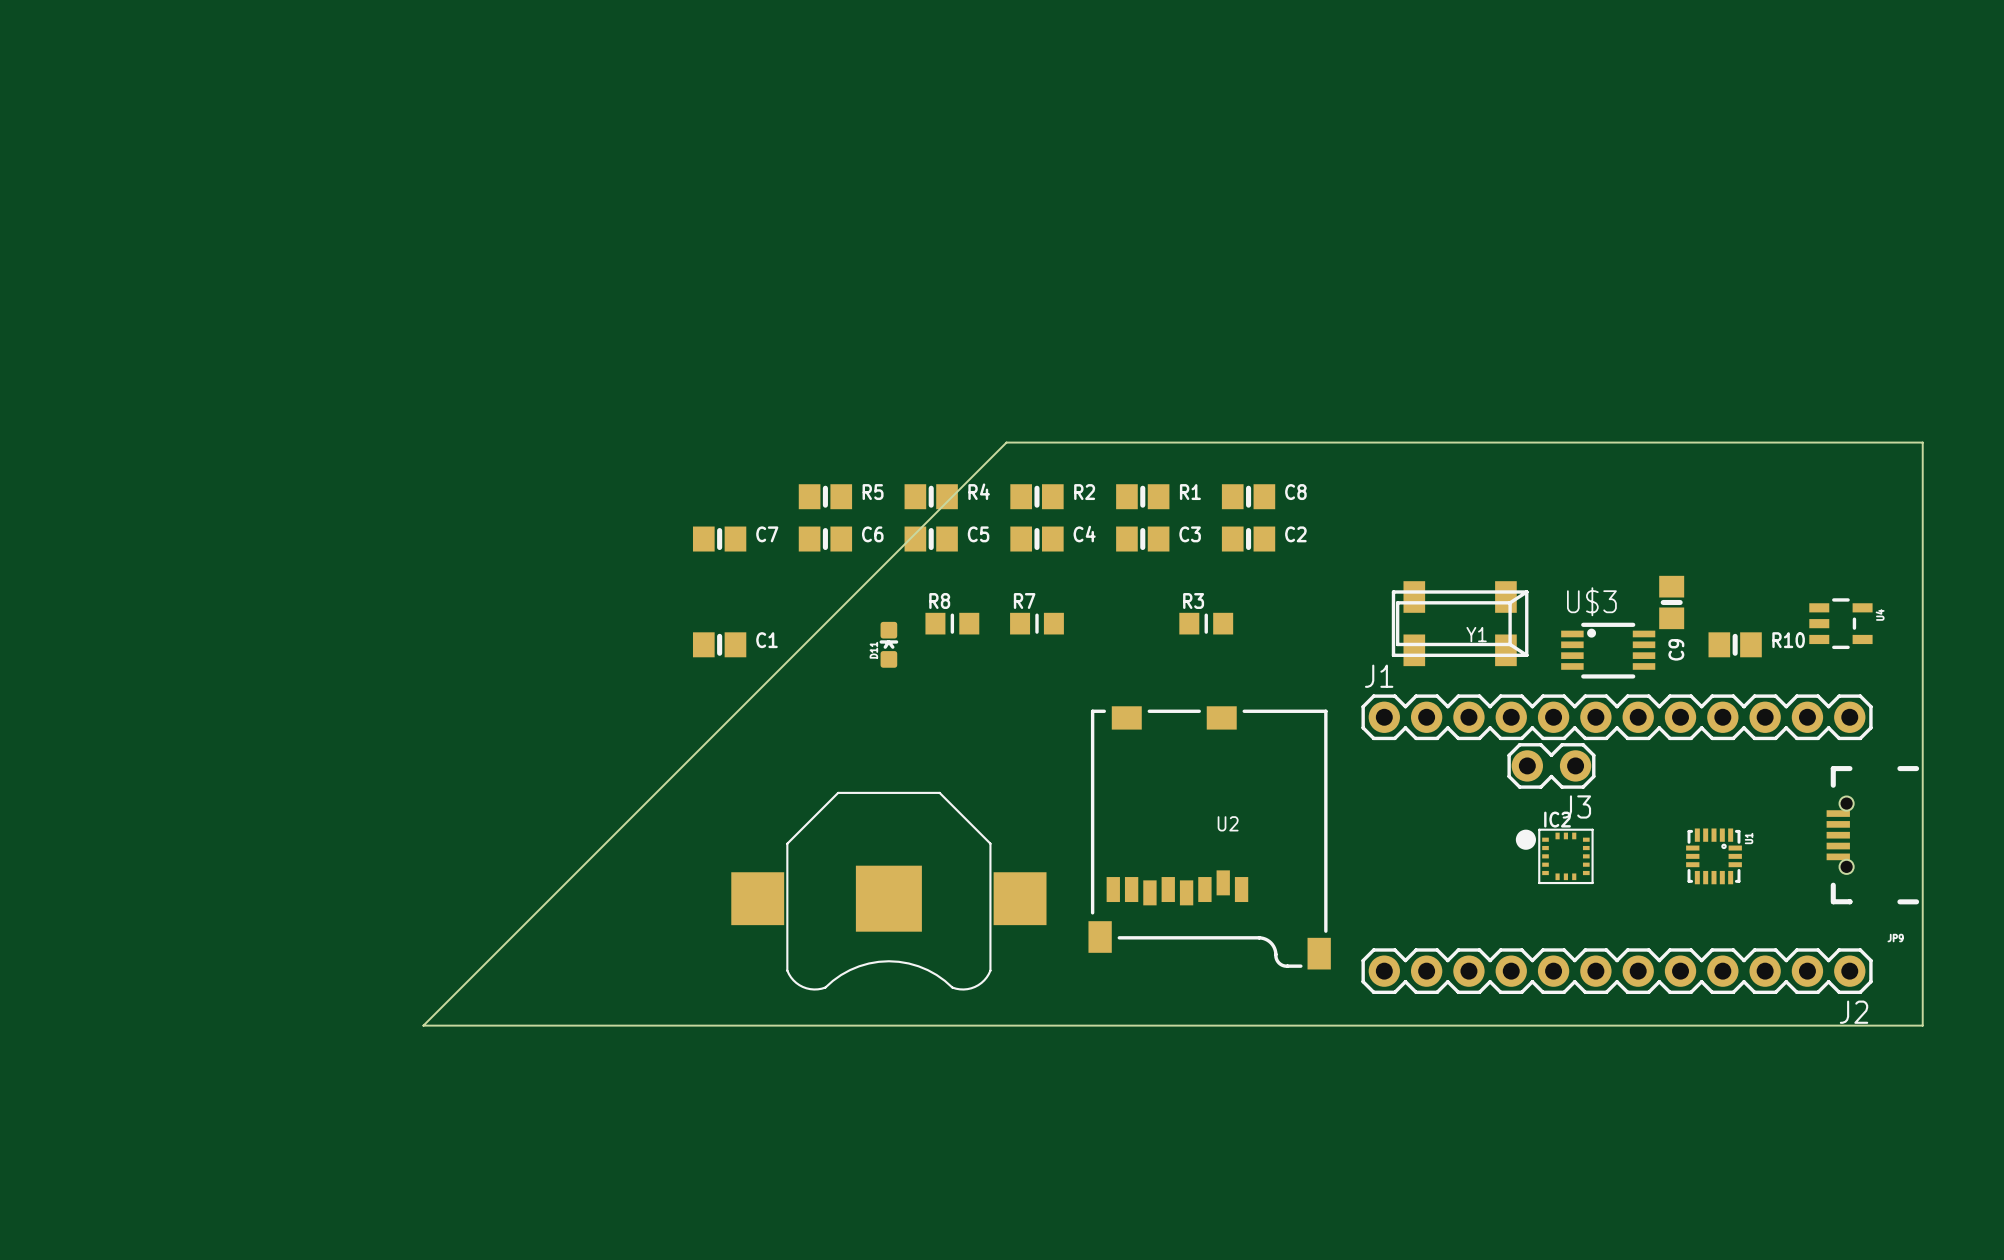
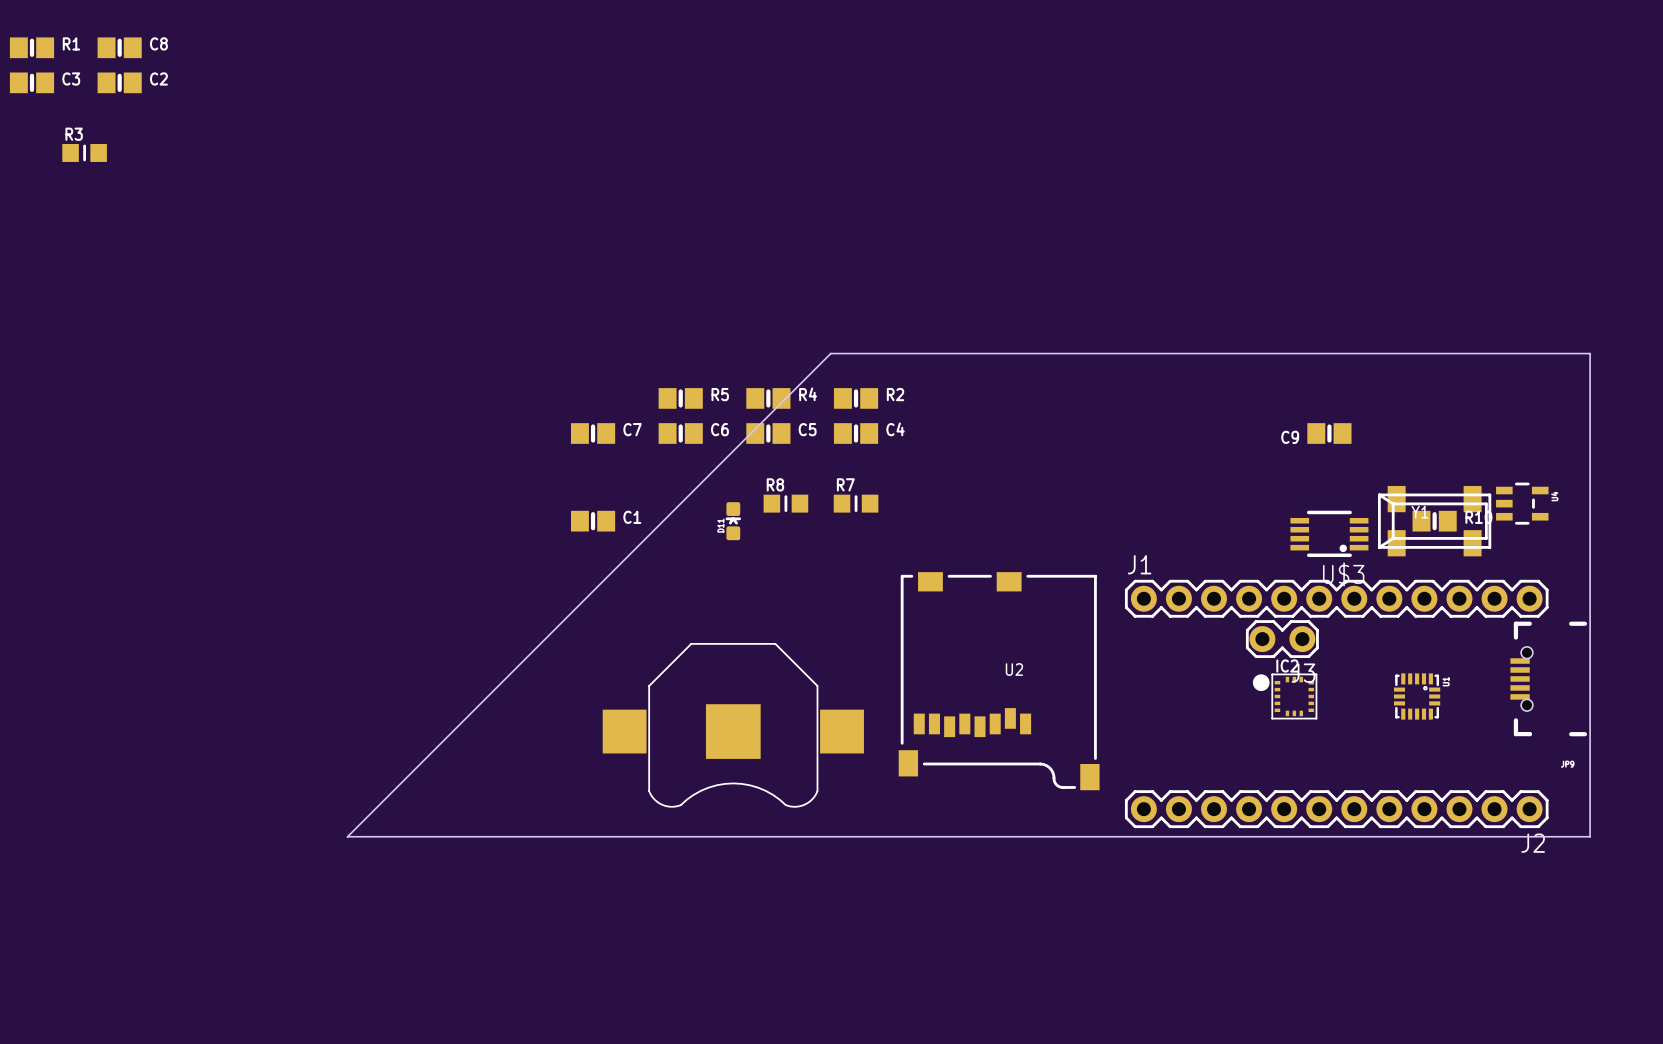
R1 position: (1142, 496) -> (32, 47)
C8 position: (1248, 496) -> (119, 47)
C3 position: (1142, 539) -> (32, 82)
C2 position: (1248, 539) -> (119, 82)
C9 rotation: 0° (1671, 602) -> 90° clockwise (1329, 433)
C9 position: (1671, 602) -> (1329, 433)
R3 position: (1206, 623) -> (84, 152)
Y1 rotation: 0° (1460, 623) -> 180° (1434, 521)
Y1 position: (1460, 623) -> (1434, 521)
U$3 rotation: 0° (1608, 650) -> 180° (1329, 533)
J1 position: (1617, 717) -> (1336, 598)
J3 position: (1551, 765) -> (1282, 639)
J2 position: (1617, 971) -> (1336, 809)

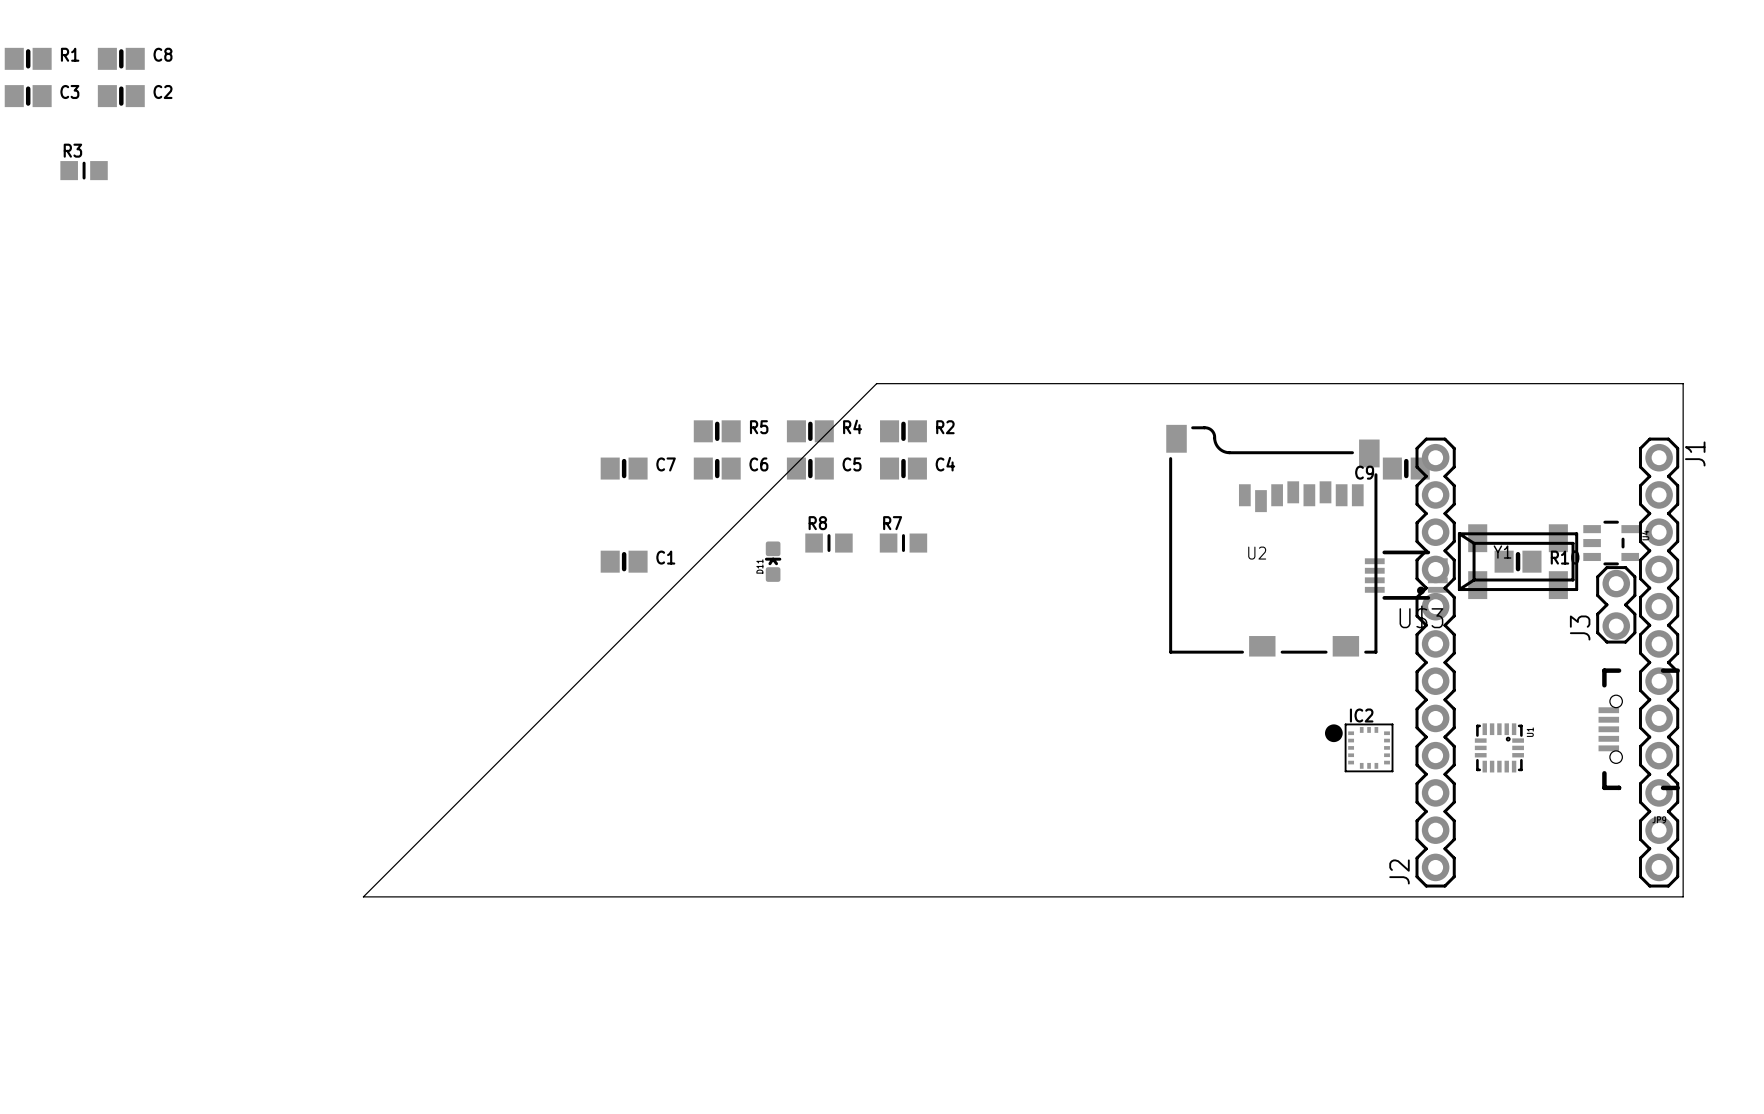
J1 rotation: 0° (1336, 598) -> 90° clockwise (1659, 662)
J3 rotation: 0° (1282, 639) -> 90° clockwise (1616, 604)
J3 position: (1282, 639) -> (1616, 604)
U2 rotation: 0° (999, 681) -> 180° (1272, 540)
U2 position: (999, 681) -> (1272, 540)
part: (733, 725) -> none
J2 rotation: 0° (1336, 809) -> 90° clockwise (1435, 662)

